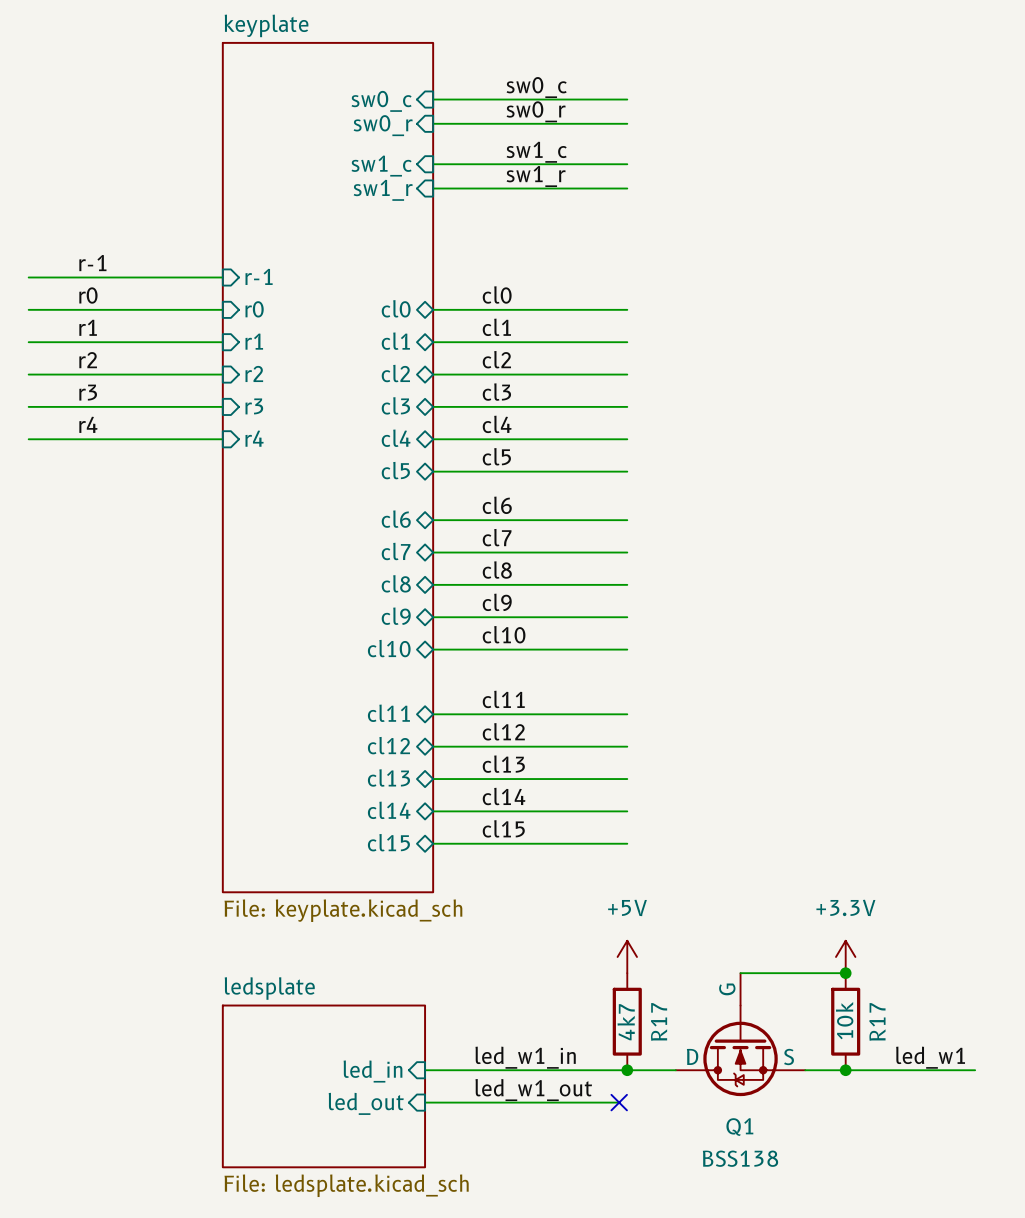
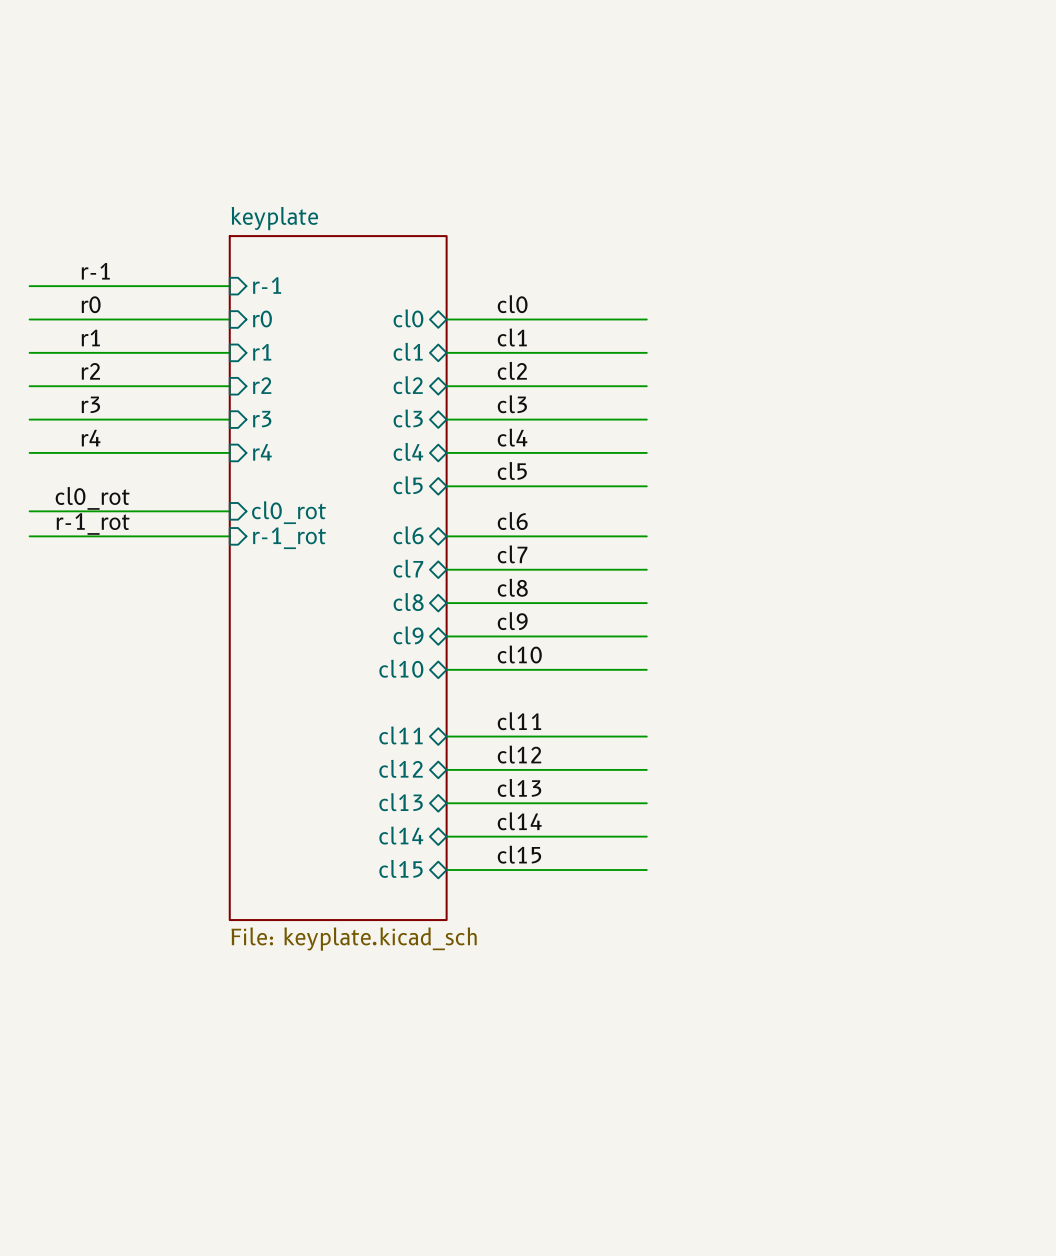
label: sw0_c (536, 87) -> none
wire: (433, 99) (627, 99) -> none
sheet pin: sw0_c (381, 101) -> none
label: sw0_r (536, 111) -> none
wire: (433, 123) (627, 123) -> none
sheet pin: sw0_r (383, 125) -> none
label: sw1_c (536, 152) -> none
wire: (433, 164) (627, 164) -> none
sheet pin: sw1_c (381, 166) -> none
label: sw1_r (536, 176) -> none
wire: (433, 188) (627, 188) -> none
sheet pin: sw1_r (383, 190) -> none
sheet keyplate: File: keyplate.kicad_sch (327, 467) -> none
label: none -> cl0_rot (92, 498)
wire: none -> (29, 511) (229, 511)
sheet pin: none -> cl0_rot (288, 512)
label: none -> r-1_rot (93, 523)
wire: none -> (29, 536) (229, 536)
sheet pin: none -> r-1_rot (289, 538)
sheet keyplate: none -> File: keyplate.kicad_sch (338, 578)
power symbol: +5V (627, 956) -> none
power symbol: +3.3V (845, 956) -> none
wire: (740, 973) (845, 973) -> none
junction: (845, 973) -> none
R17: 4k7 (627, 1021) -> none
R17: 10k (845, 1021) -> none
Q1: BSS138 (740, 1034) -> none
label: led_w1_in (525, 1057) -> none
label: led_w1 (930, 1057) -> none
wire: (425, 1070) (675, 1070) -> none
junction: (627, 1070) -> none
wire: (805, 1070) (975, 1070) -> none
junction: (845, 1070) -> none
sheet pin: led_in (373, 1071) -> none
sheet ledsplate: File: ledsplate.kicad_sch (323, 1086) -> none
label: led_w1_out (533, 1090) -> none
wire: (425, 1102) (619, 1102) -> none
no-connect mark: (619, 1102) -> none
sheet pin: led_out (366, 1103) -> none

